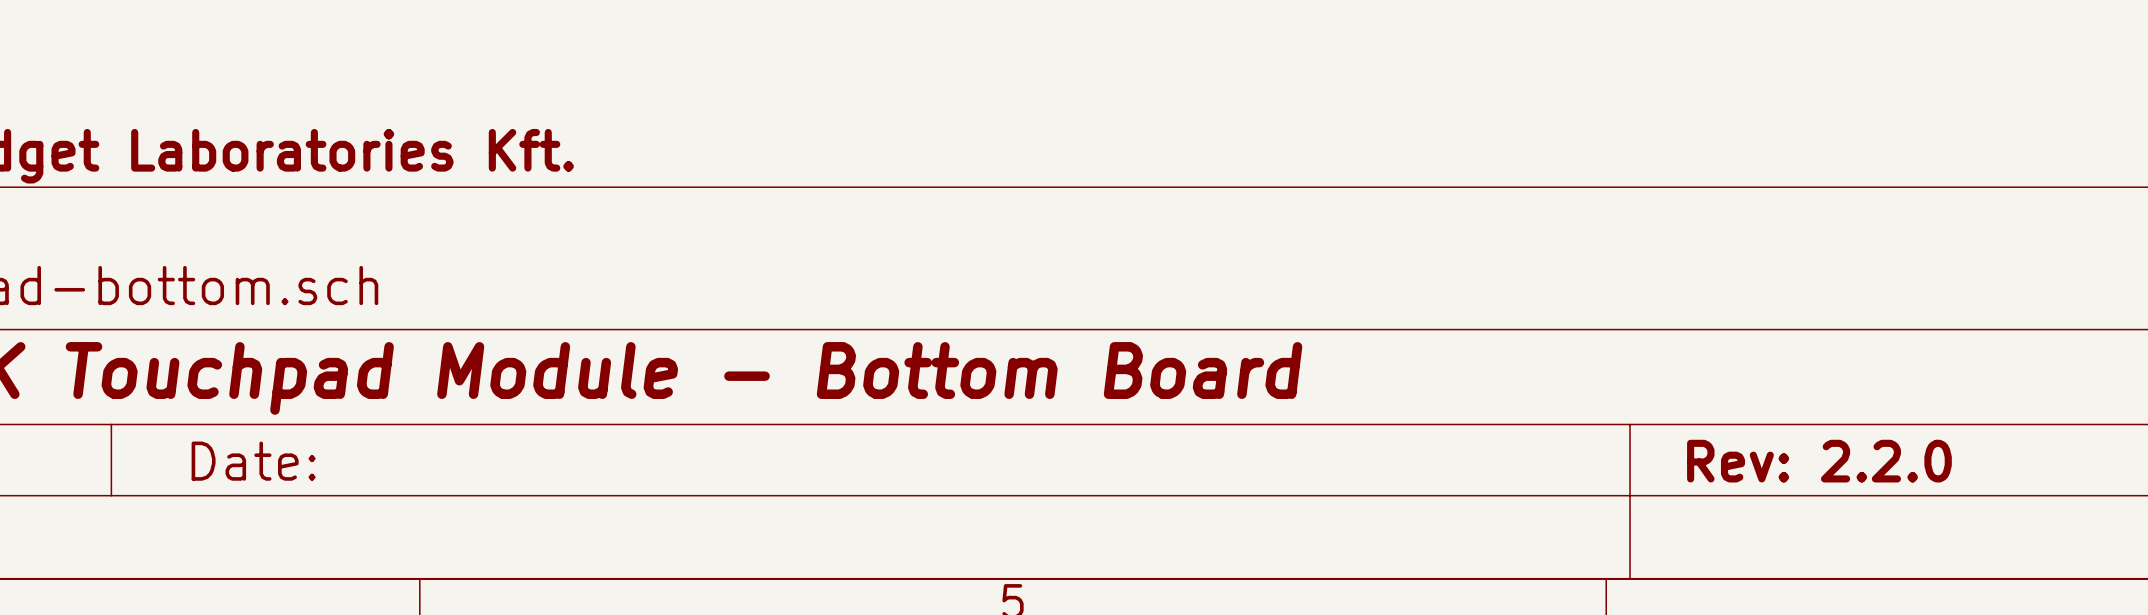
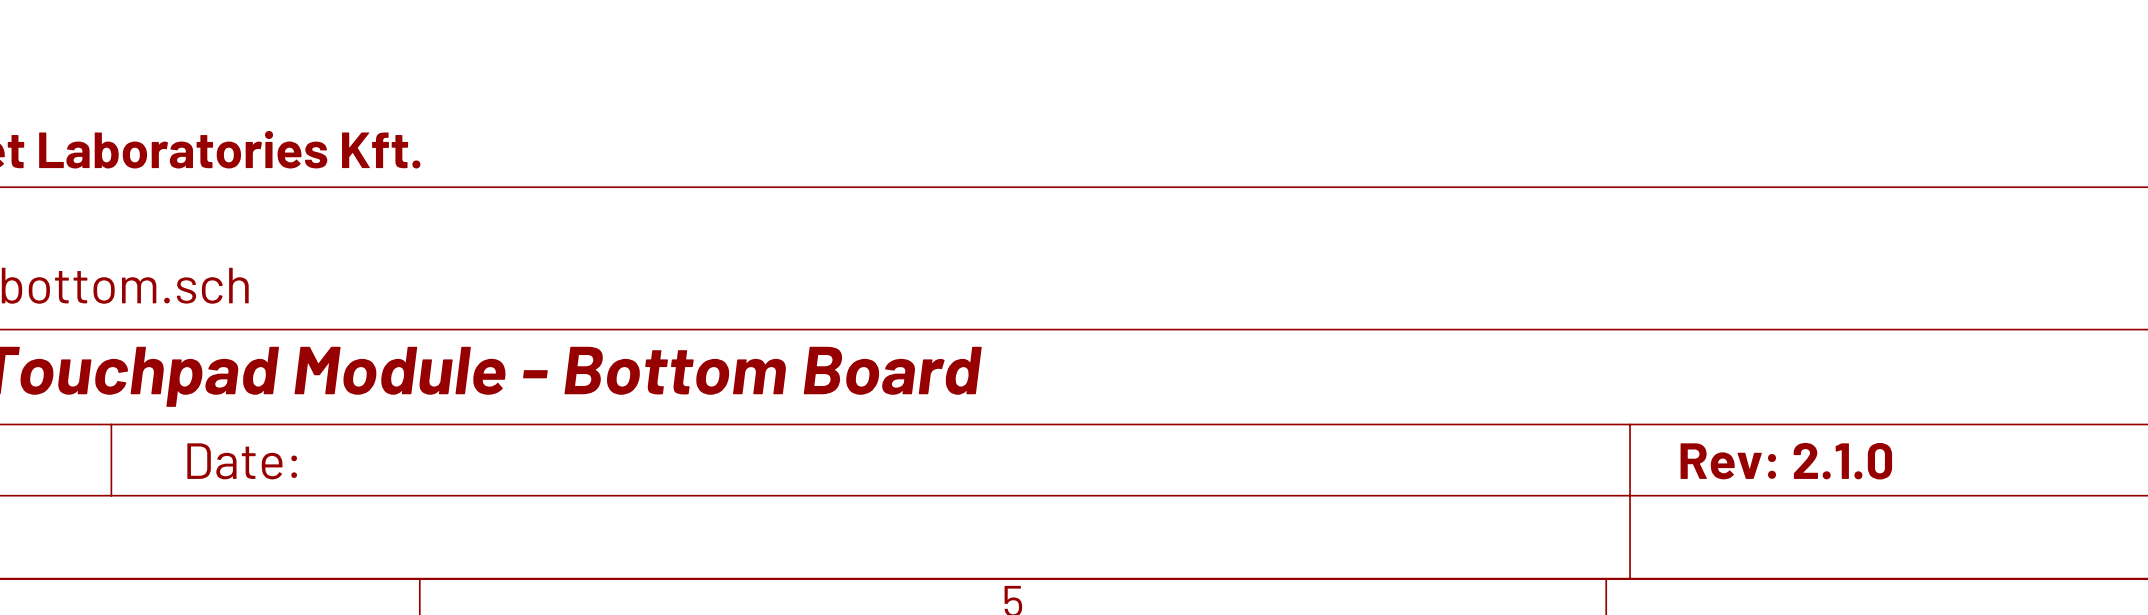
title block: Rev: 2.2.0 (1819, 461) -> Rev: 2.1.0 (1786, 461)

